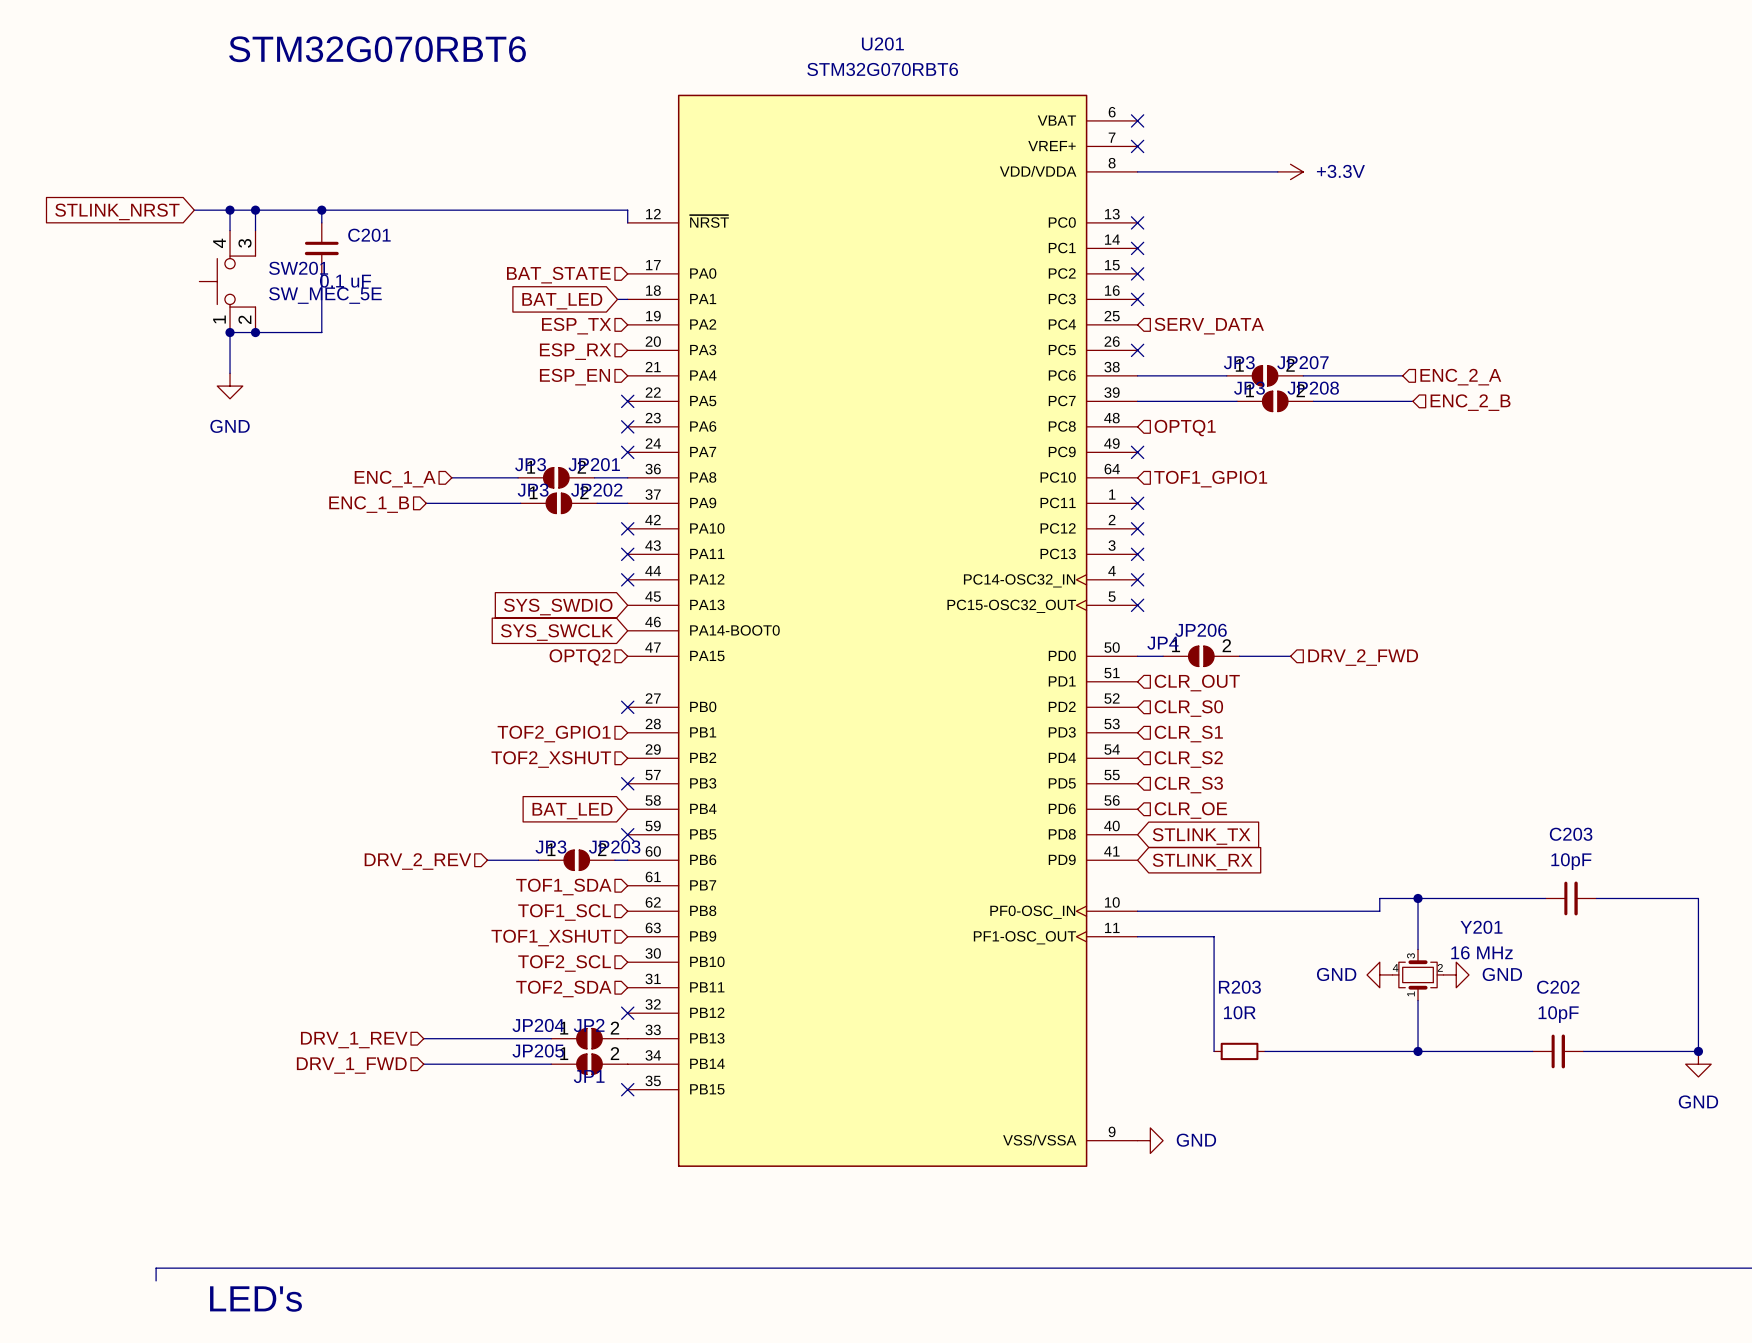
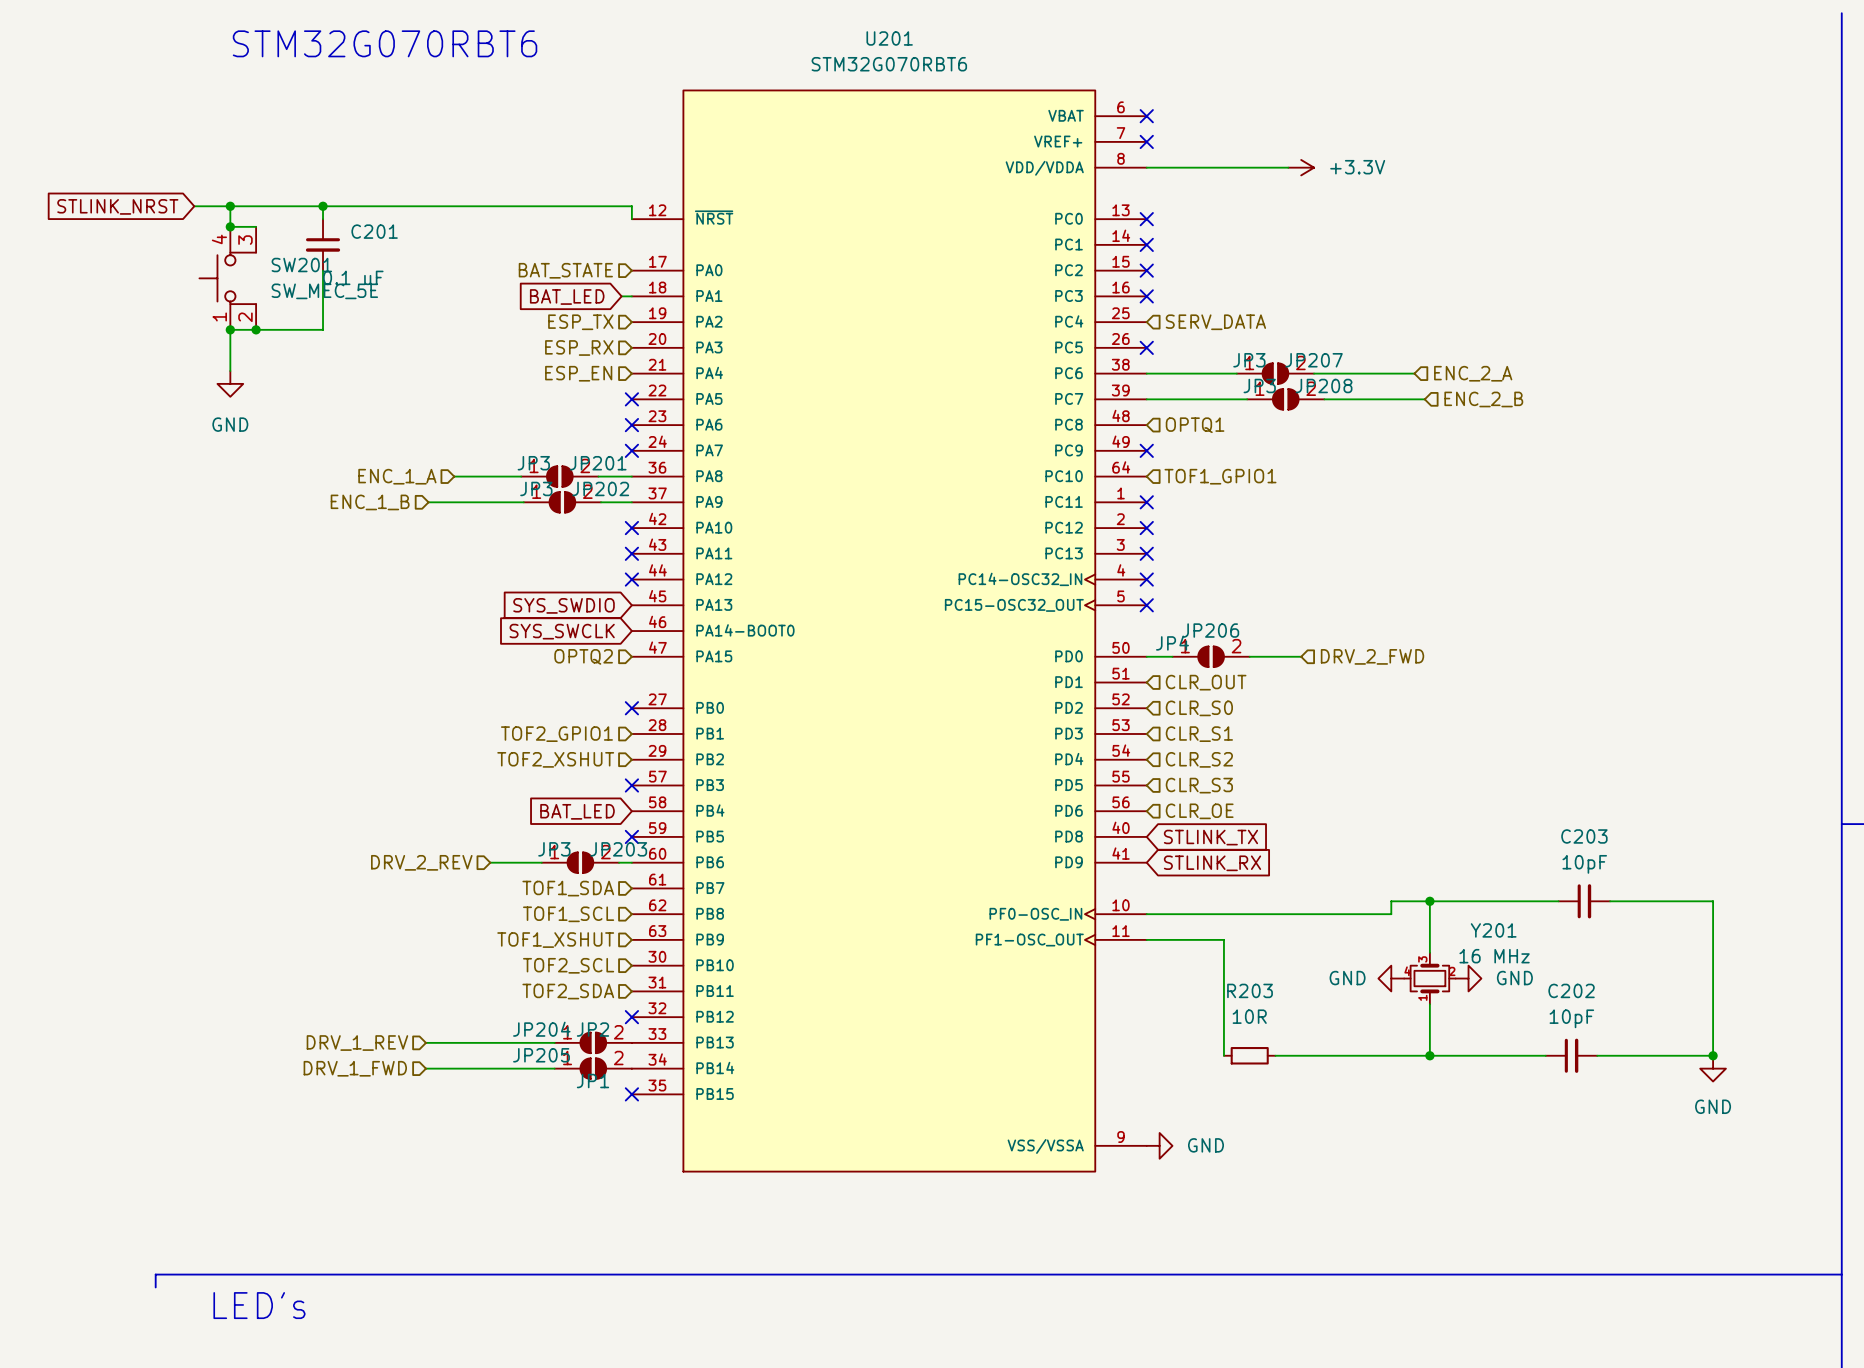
wire: (255, 210) (255, 230) -> (230, 226) (256, 226)
junction position: (255, 210) -> (230, 226)

